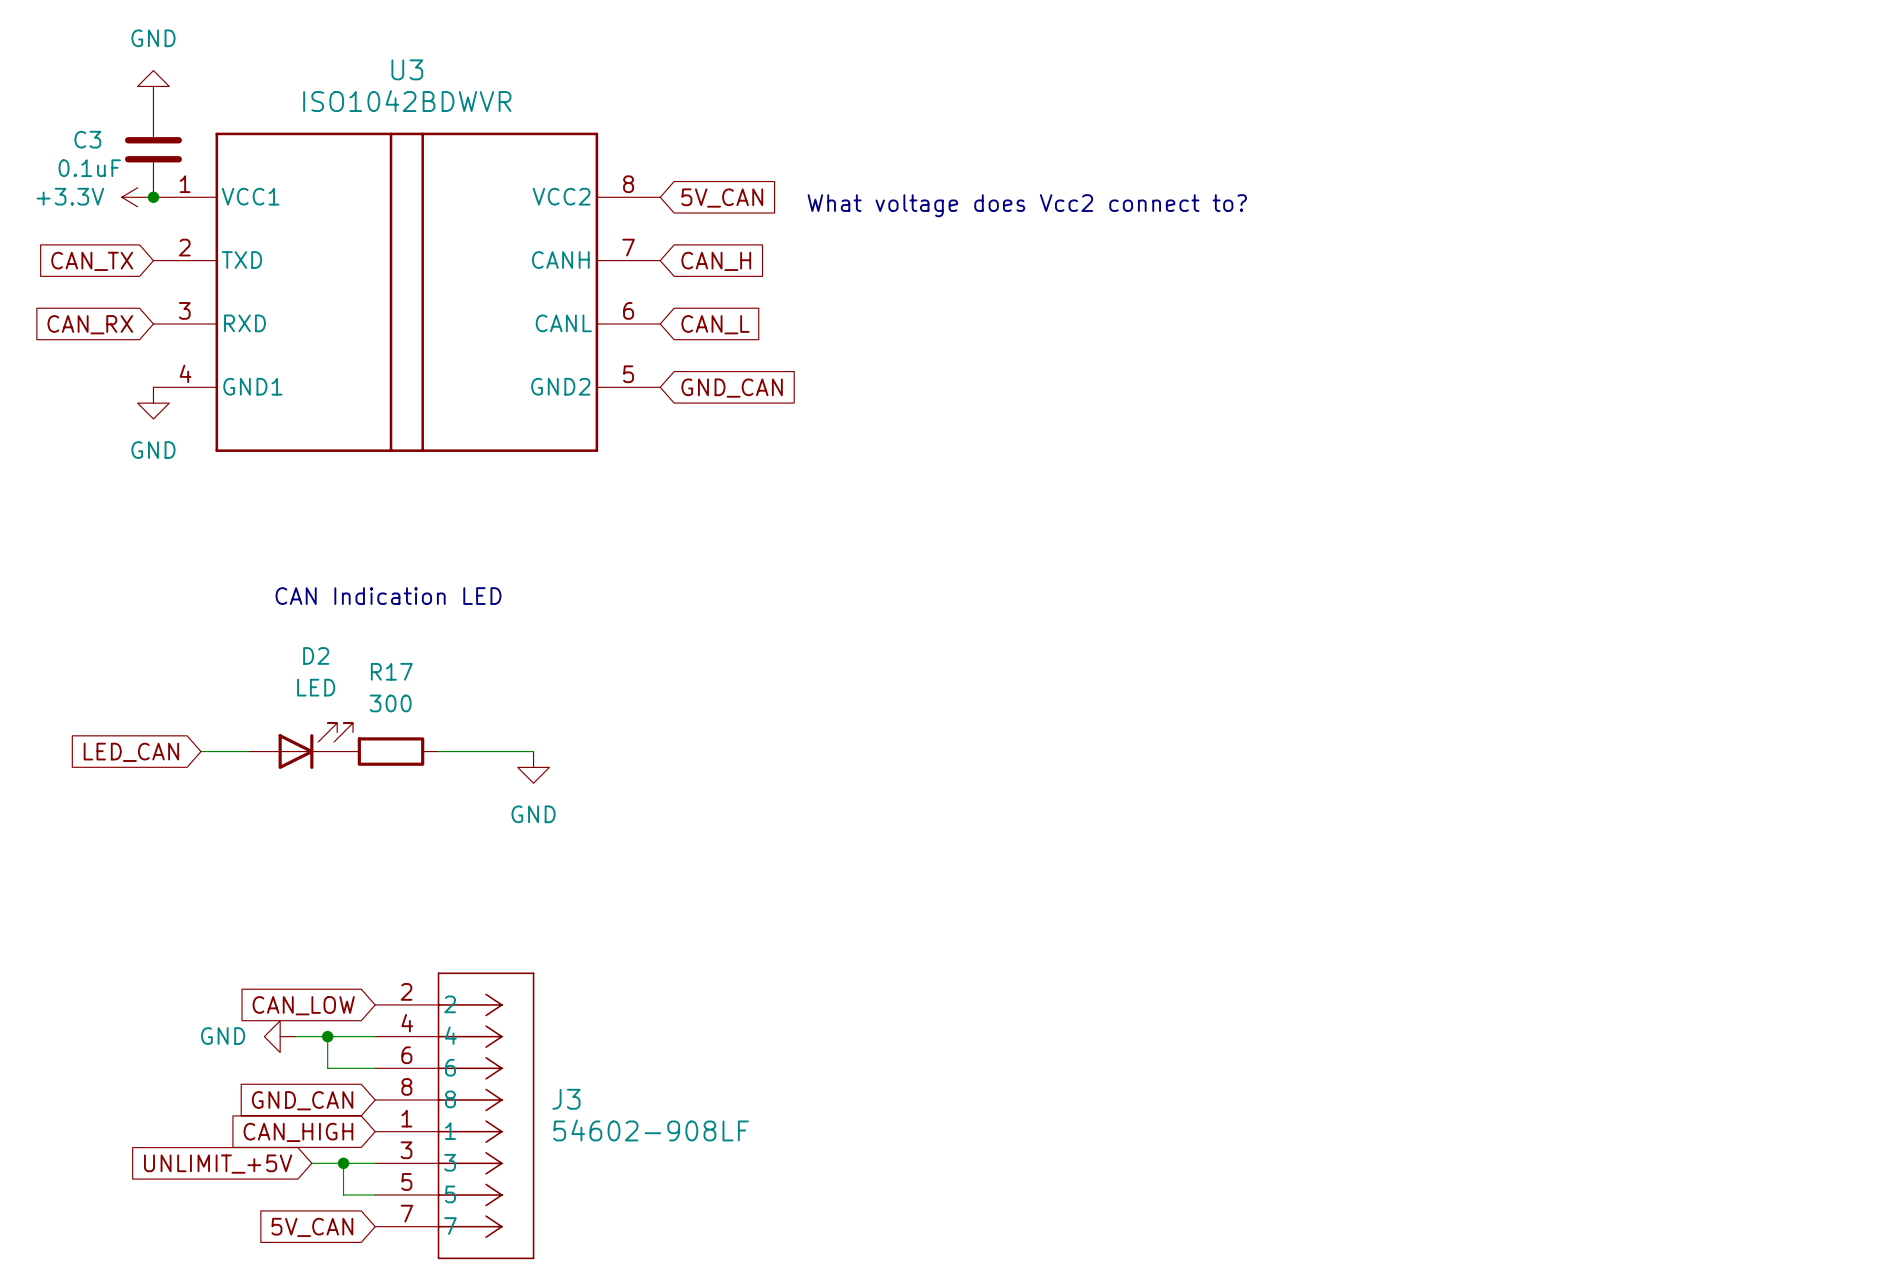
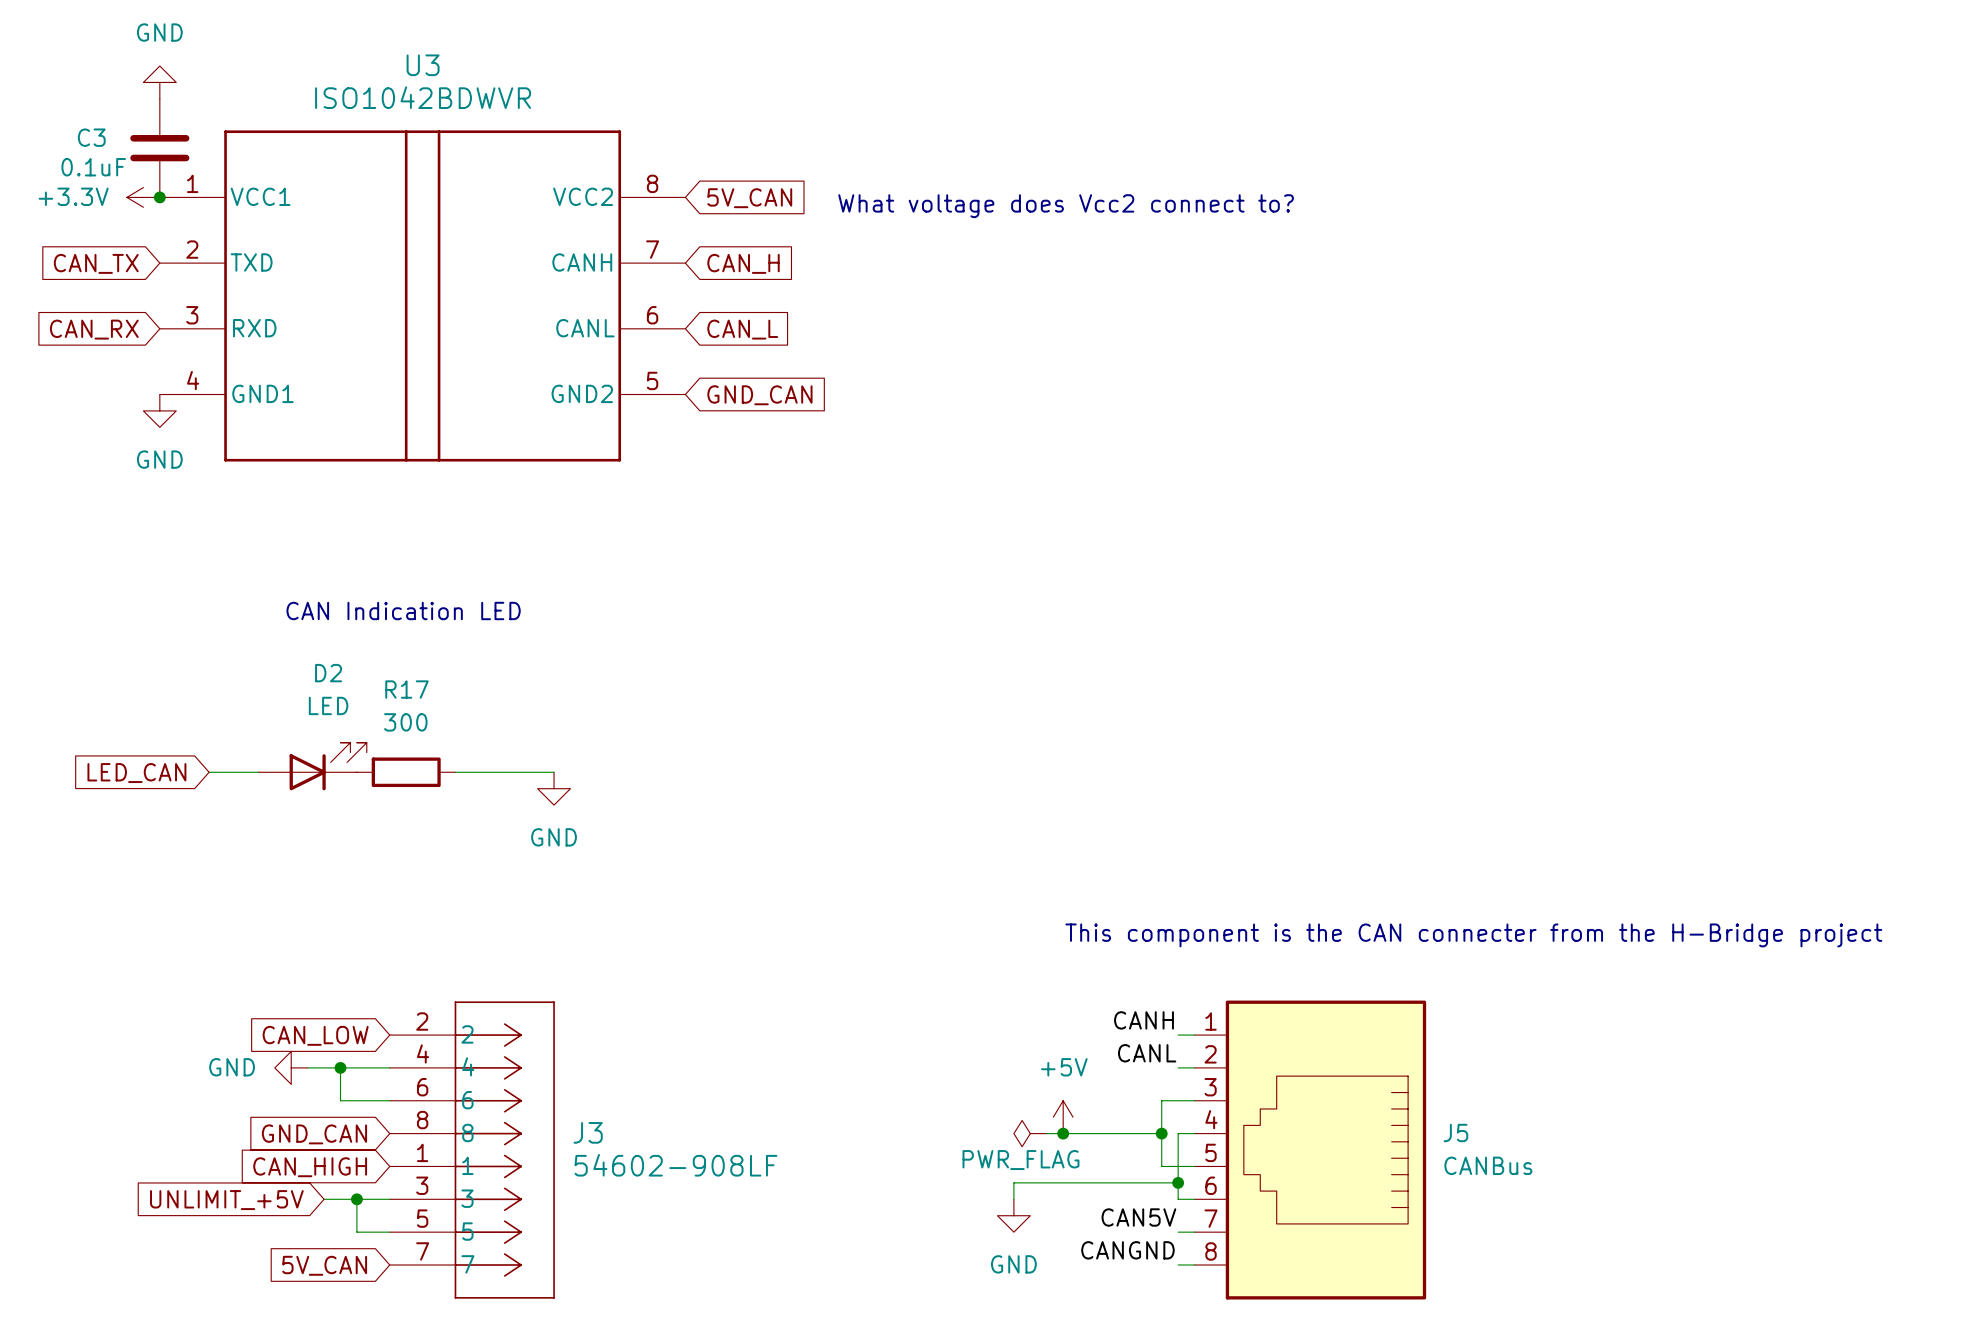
text: none -> This component is the CAN connecter from the H-Bridge project (1473, 935)
label: none -> CANH (1144, 1020)
wire: none -> (1178, 1035) (1194, 1035)
label: none -> CANL (1147, 1053)
wire: none -> (1178, 1067) (1194, 1067)
wire: none -> (1194, 1100) (1161, 1100) (1161, 1166) (1194, 1166)
power symbol: none -> +5V (1063, 1117)
power symbol: none -> PWR_FLAG (1030, 1133)
wire: none -> (1046, 1133) (1161, 1133)
junction: none -> (1063, 1133)
junction: none -> (1161, 1133)
wire: none -> (1194, 1133) (1178, 1133) (1178, 1199) (1194, 1199)
J5: none -> CANBus (1310, 1150)
wire: none -> (1178, 1182) (1013, 1182) (1013, 1199)
junction: none -> (1178, 1182)
power symbol: none -> GND (1013, 1215)
label: none -> CAN5V (1138, 1217)
wire: none -> (1178, 1232) (1194, 1232)
label: none -> CANGND (1127, 1250)
wire: none -> (1178, 1265) (1194, 1265)

